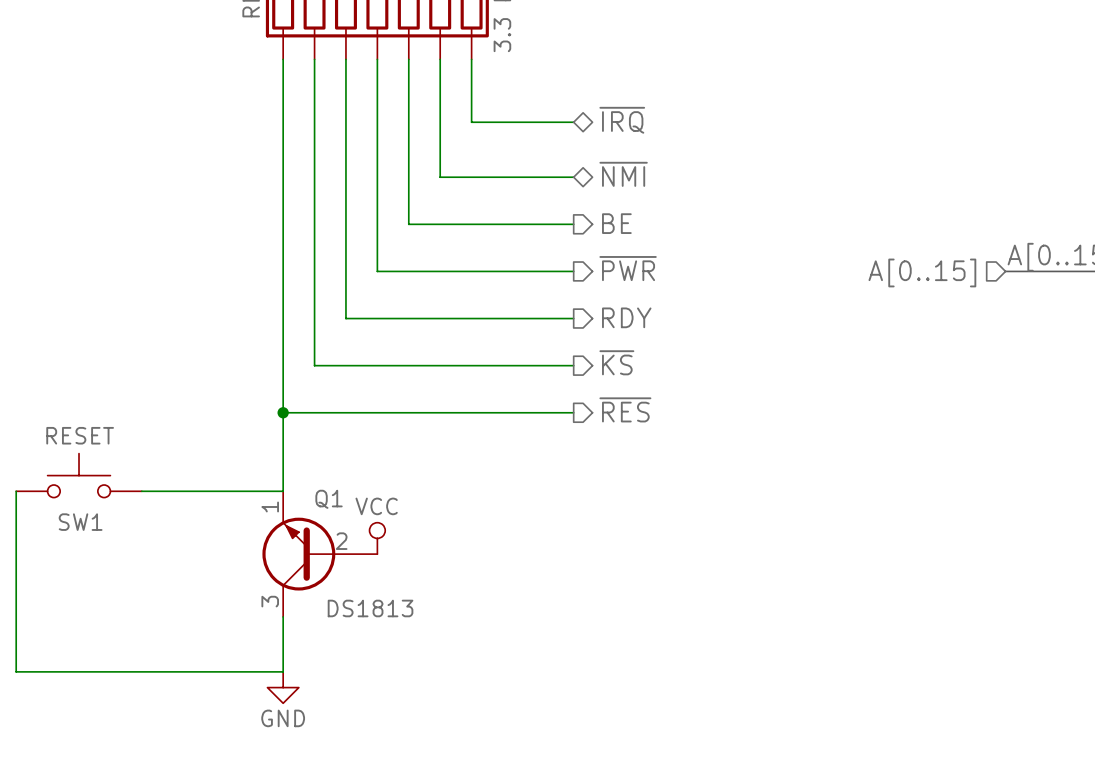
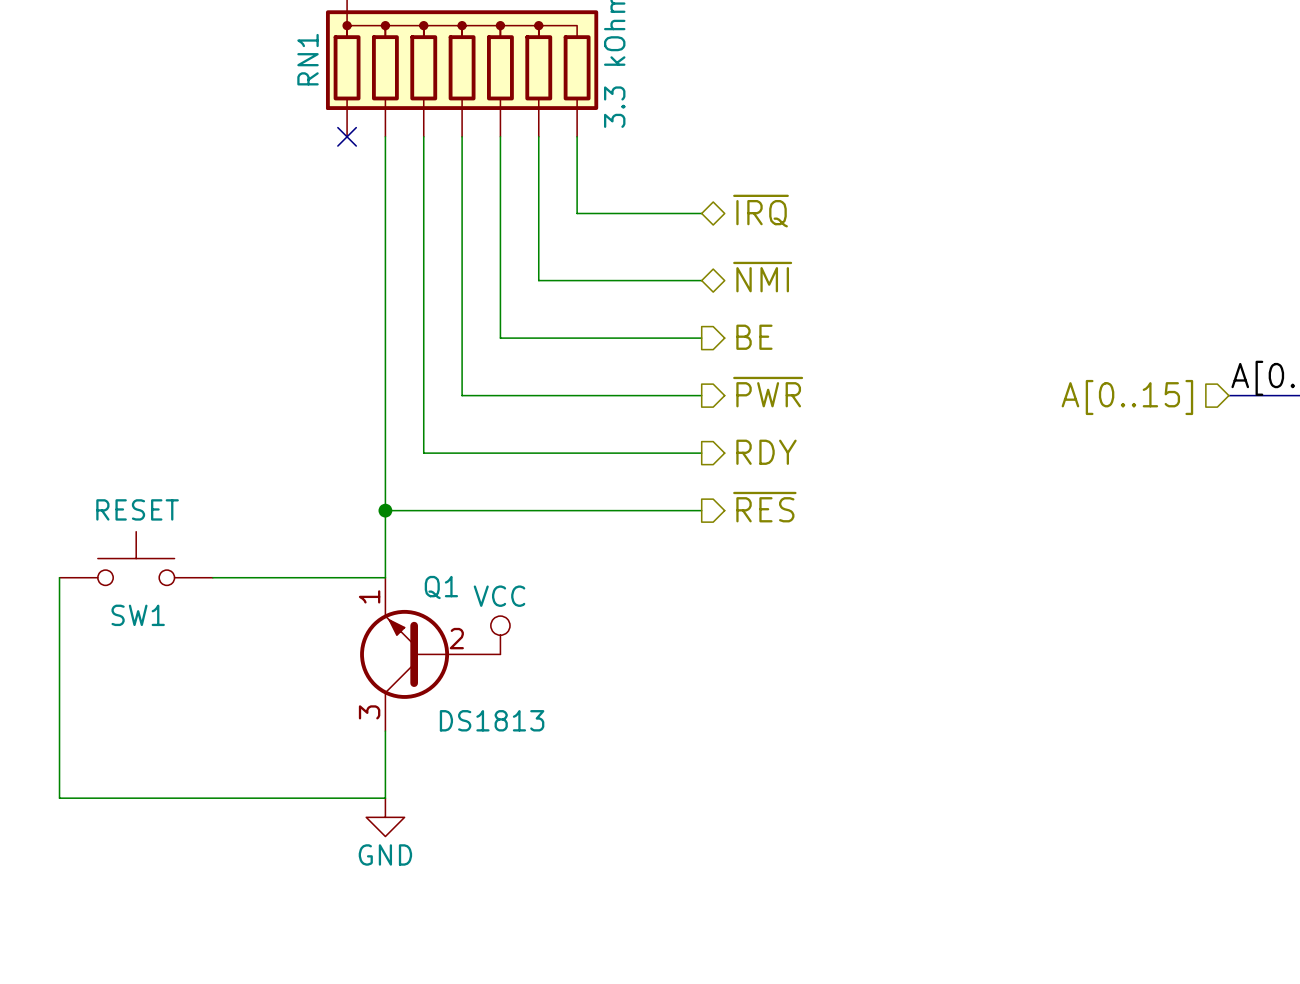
wire: (283, 59) (283, 491) (141, 491) -> none
no-connect mark: none -> (347, 136)
hierarchical label: ~{KS} (616, 362) -> ~{RES} (764, 507)
wire: none -> (385, 510) (385, 577) (212, 577)
hierarchical label: ~{RES} (625, 409) -> none
wire: (283, 412) (573, 412) -> none
junction position: (283, 412) -> (385, 510)
SW1 position: (79, 475) -> (136, 558)
wire: (16, 491) (16, 671) (283, 671) (283, 616) -> (59, 577) (59, 798) (385, 798) (385, 731)
power symbol position: VCC (377, 538) -> VCC (500, 635)
Q1 position: (319, 554) -> (430, 654)
power symbol position: GND (283, 687) -> GND (385, 817)

